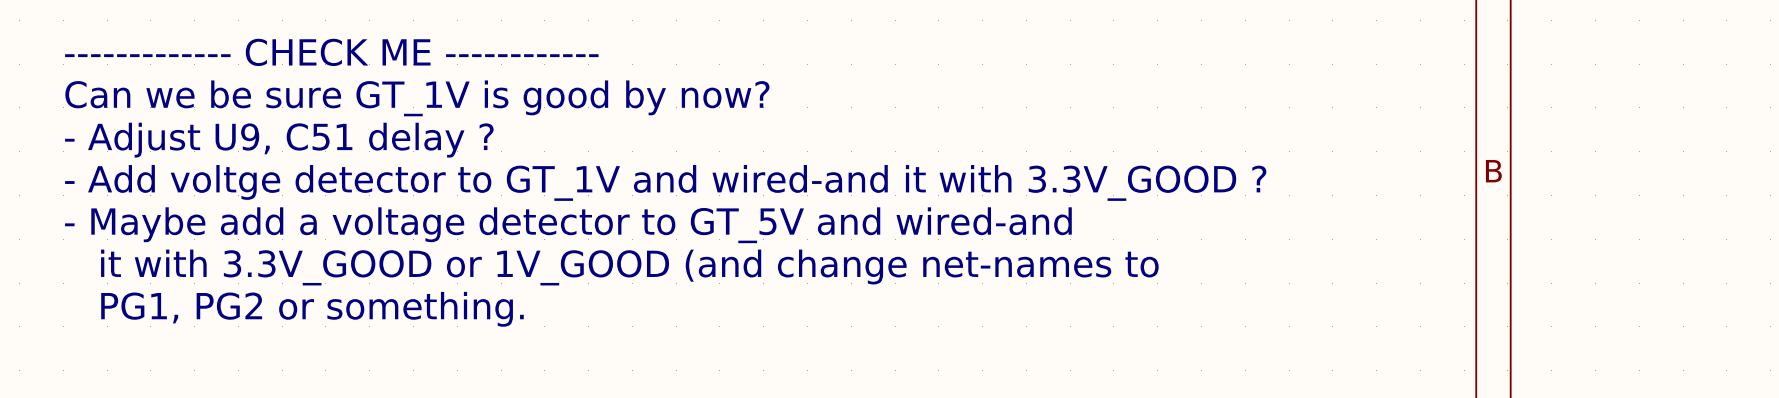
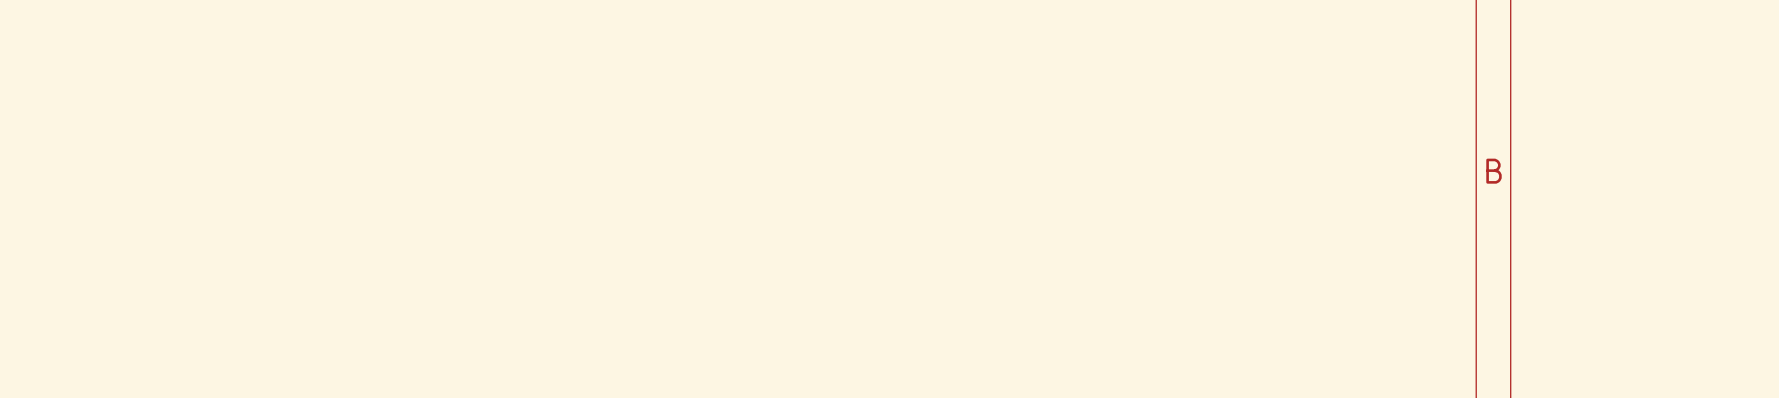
text: ------------- CHECK ME ------------ (331, 52) -> none
text: Can we be sure GT_1V is good by now? (417, 98) -> none
text: - Adjust U9, C51 delay ? (279, 140) -> none
text: - Add voltge detector to GT_1V and wired-and it with 3.3V_GOOD ? (665, 182) -> none
text: - Maybe add a voltage detector to GT_5V and wired-and (568, 225) -> none
text: it with 3.3V_GOOD or 1V_GOOD (and change net-names to (629, 267) -> none
text: PG1, PG2 or something. (312, 309) -> none

